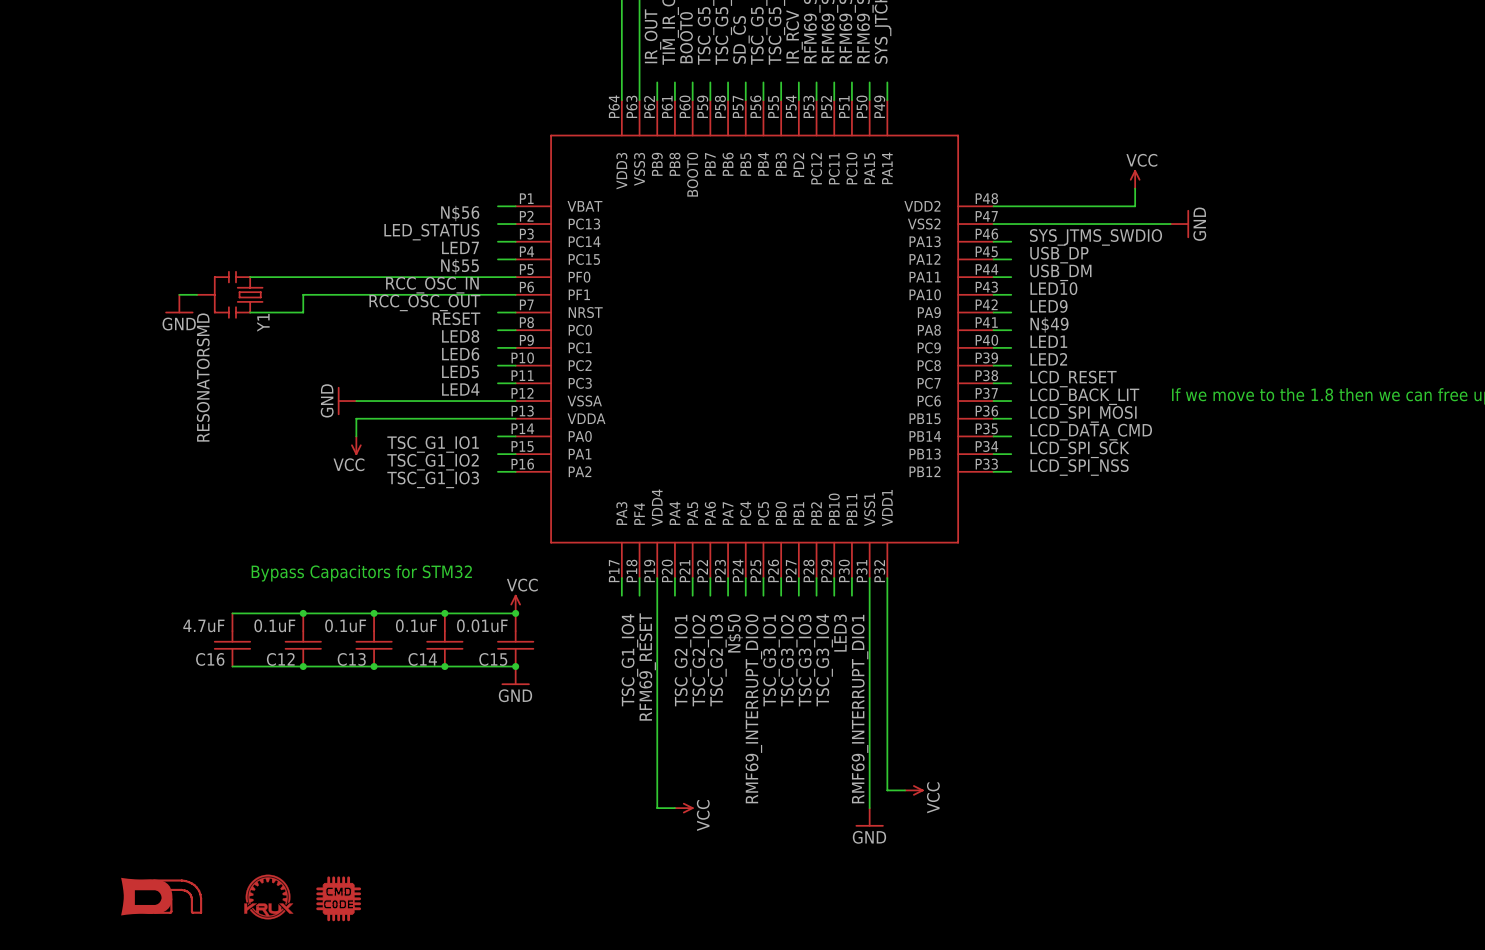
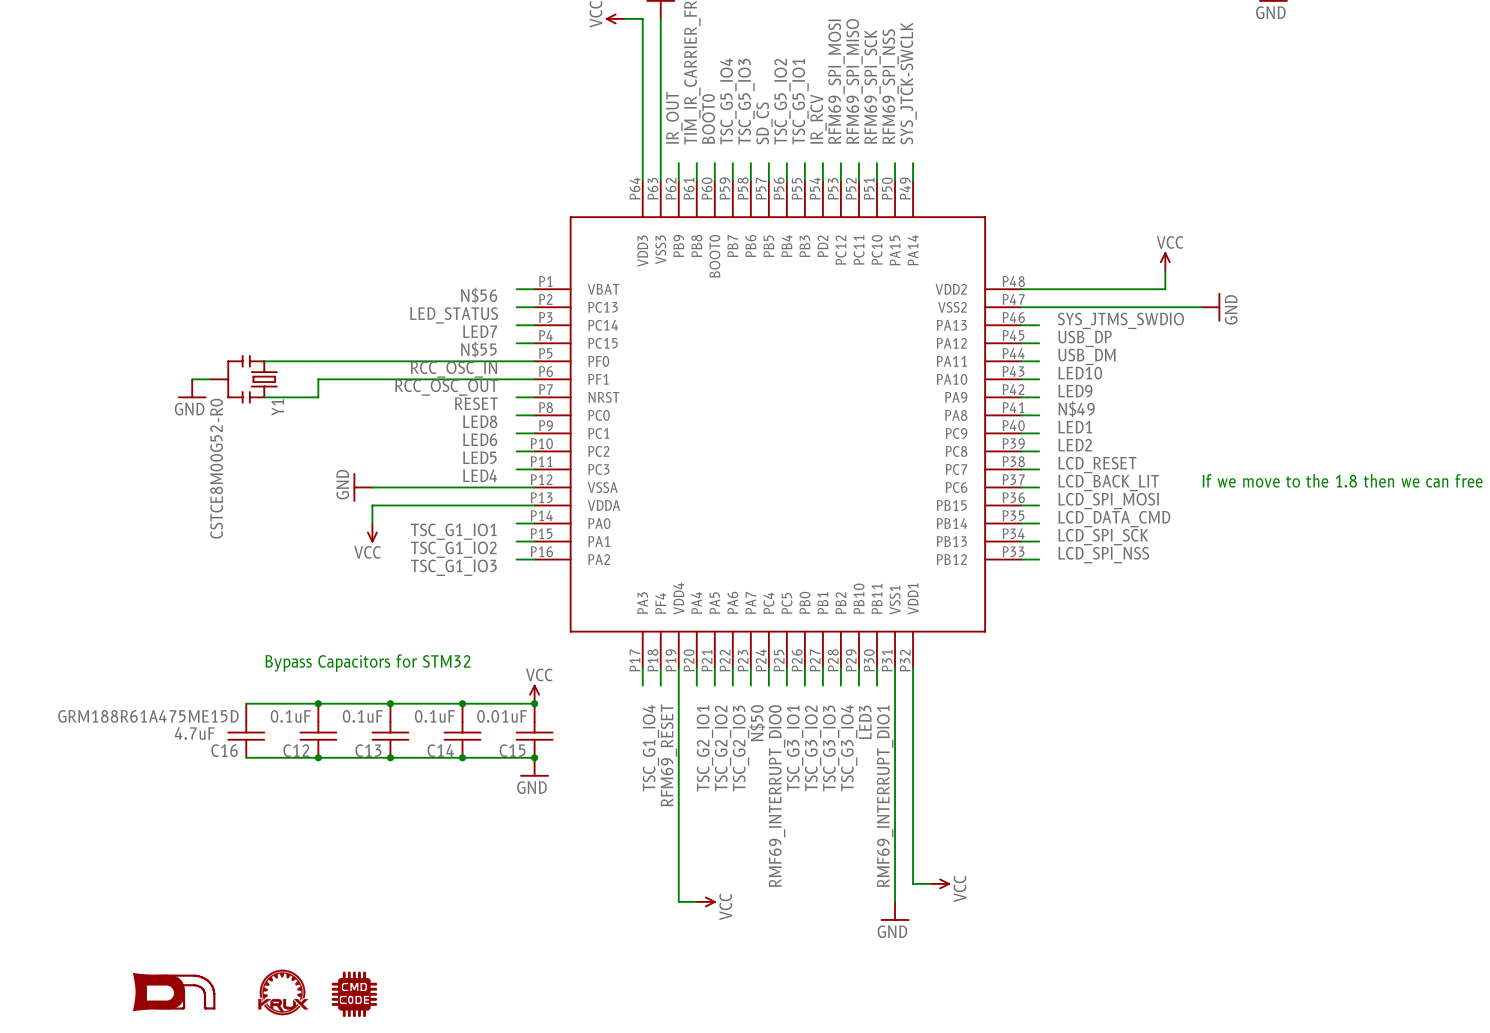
Y1 value: RESONATORSMD (203, 377) -> CSTCE8M00G52-R0 (216, 468)
C16 value: 4.7uF (203, 625) -> GRM188R61A475ME15D (148, 716)
text: none -> 4.7uF (194, 733)

